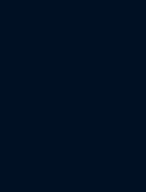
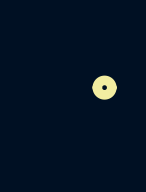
part: none -> (104, 87)

